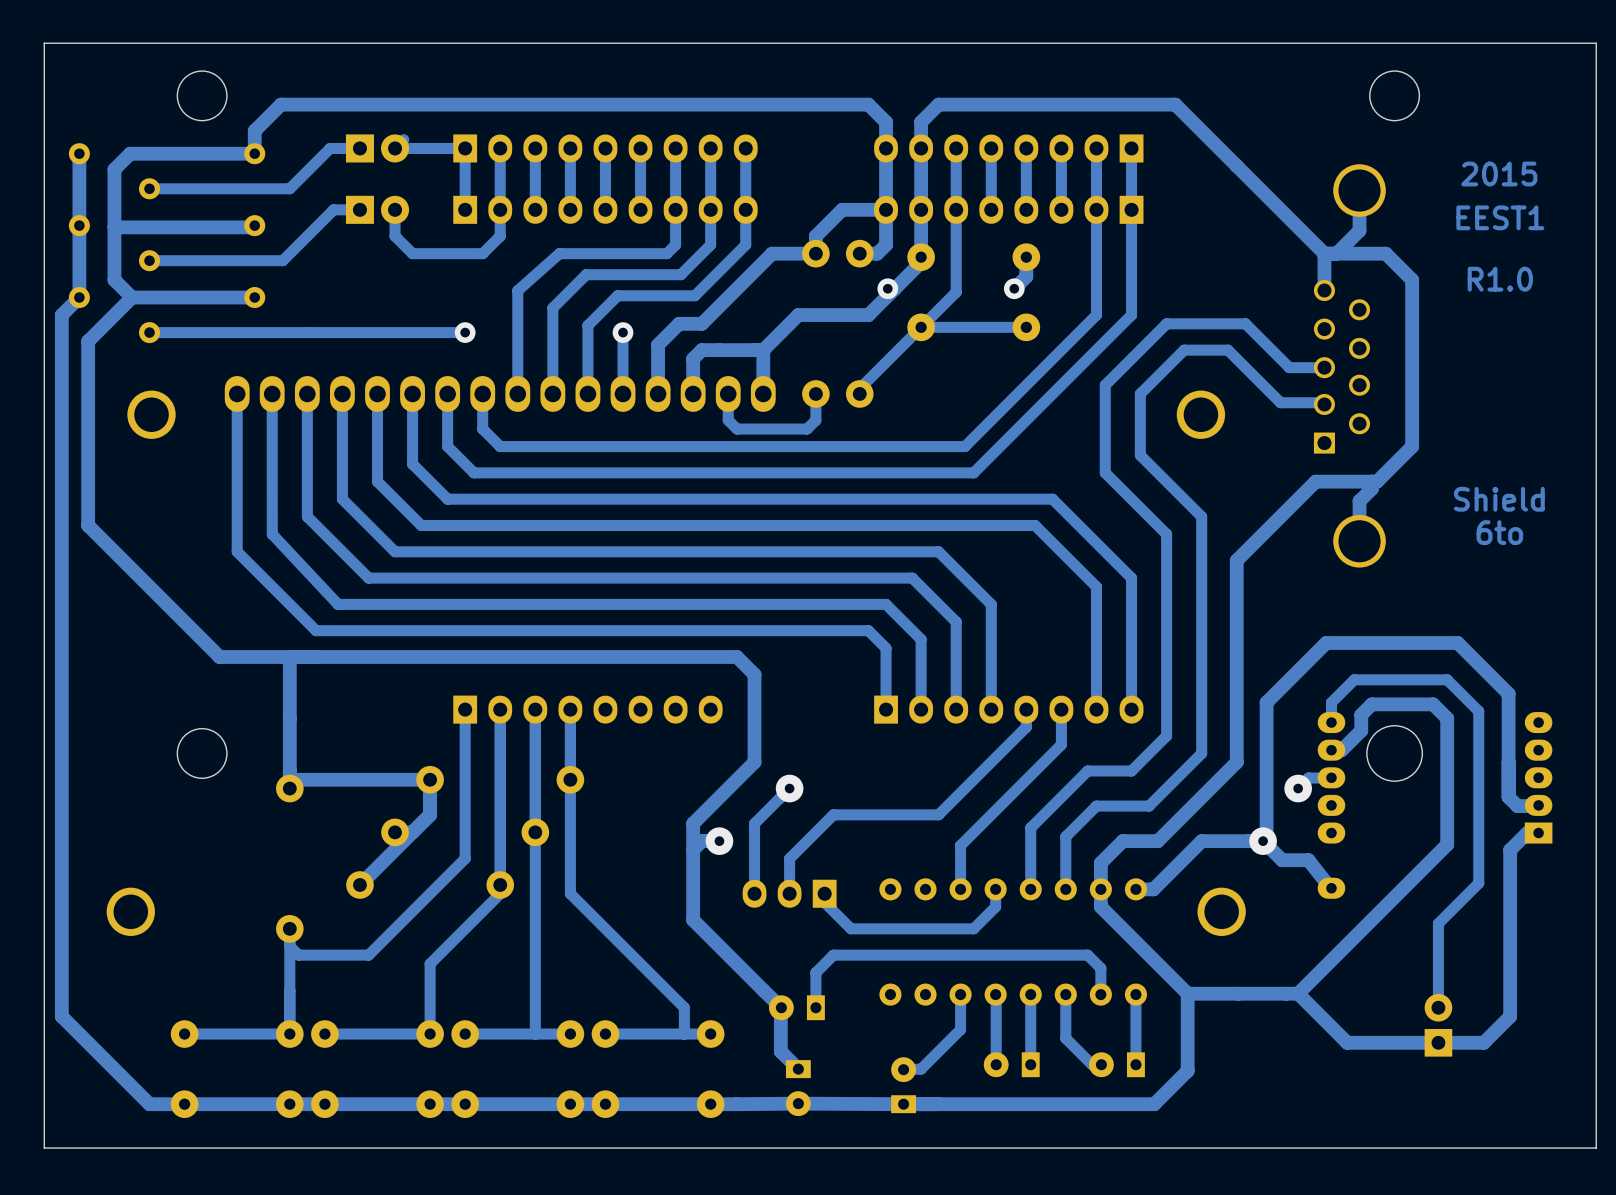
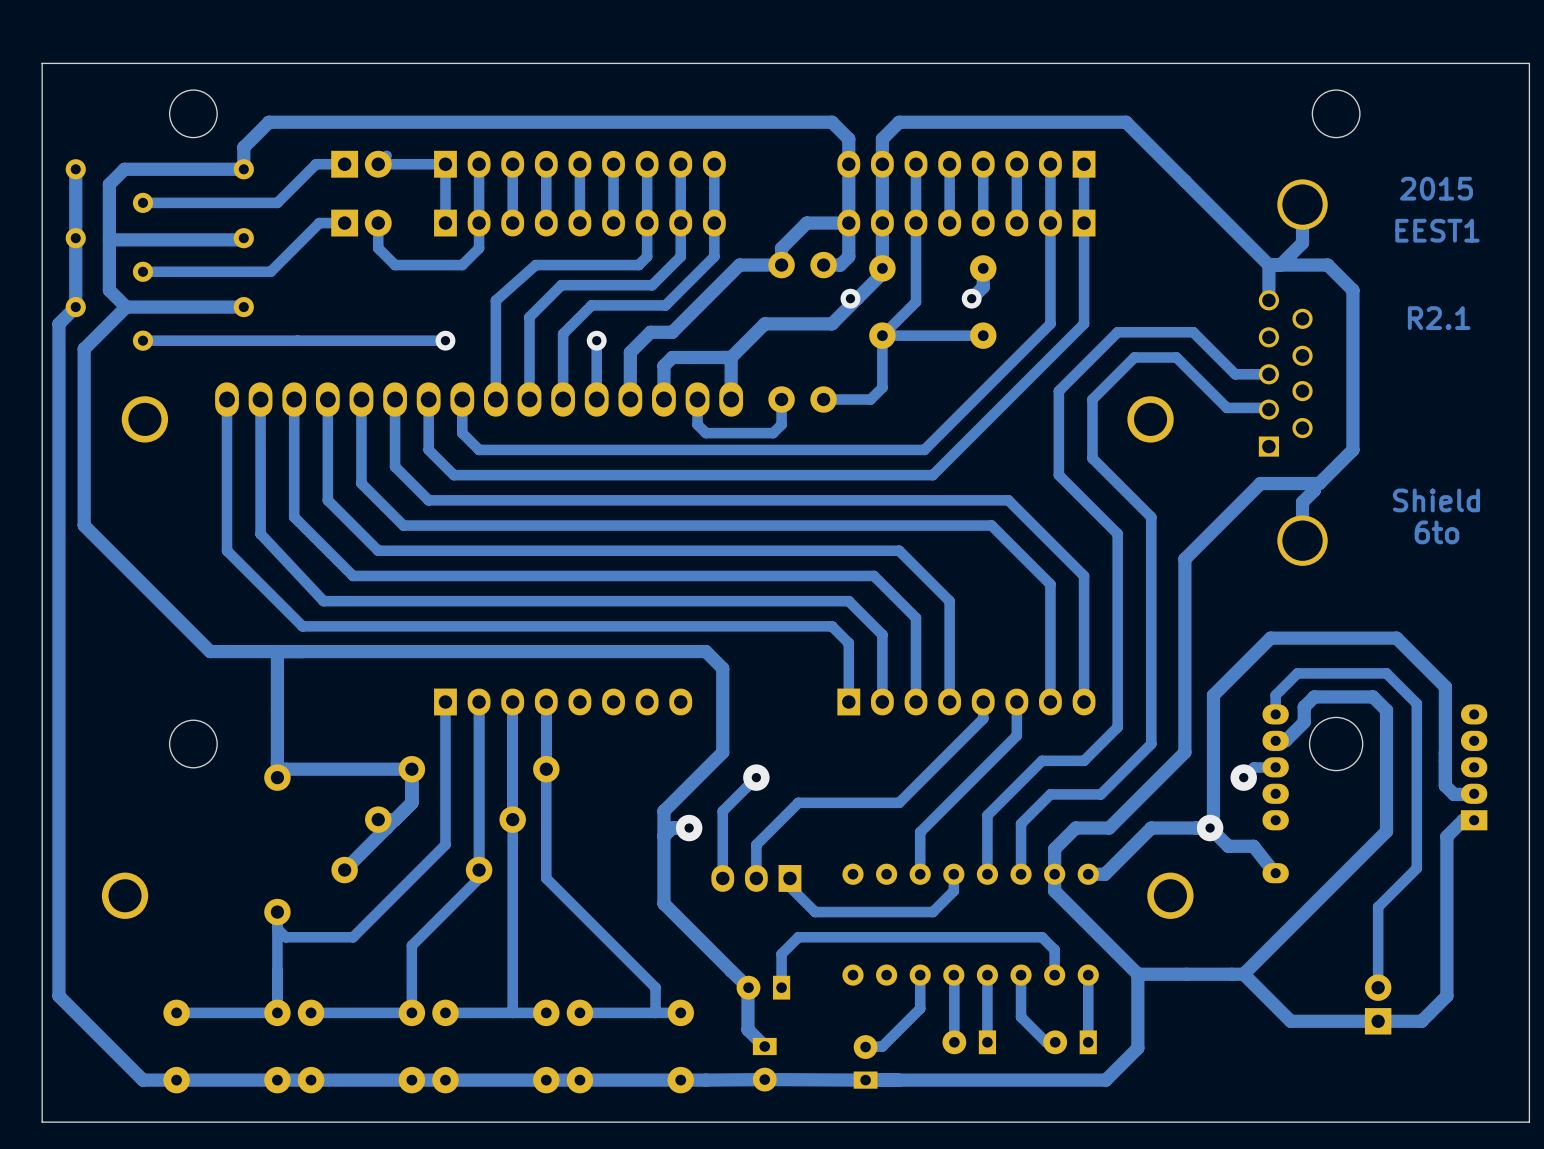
text: R1.0 (1500, 279) -> none
text: none -> R2.1 (1439, 318)
track: (921, 327) (859, 388) (859, 393) -> (882, 335) (882, 387) (870, 399) (823, 399)

